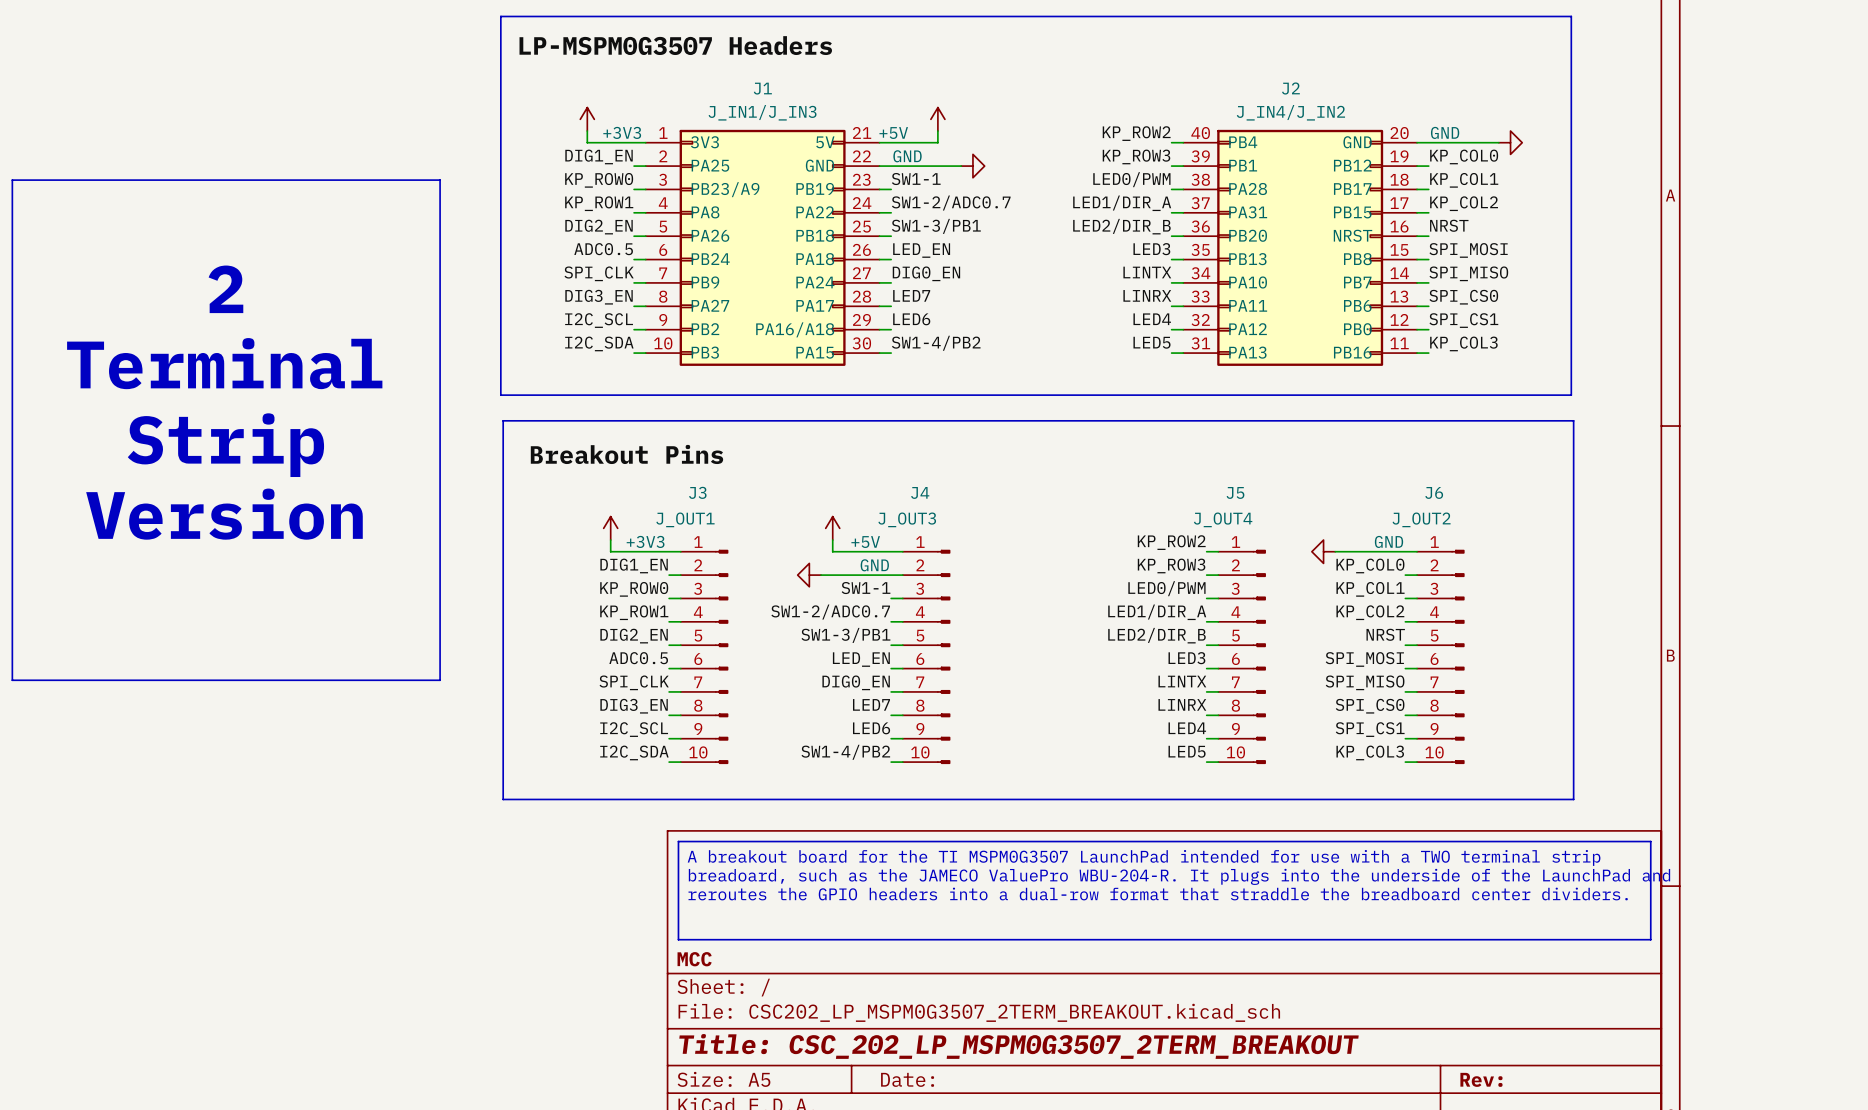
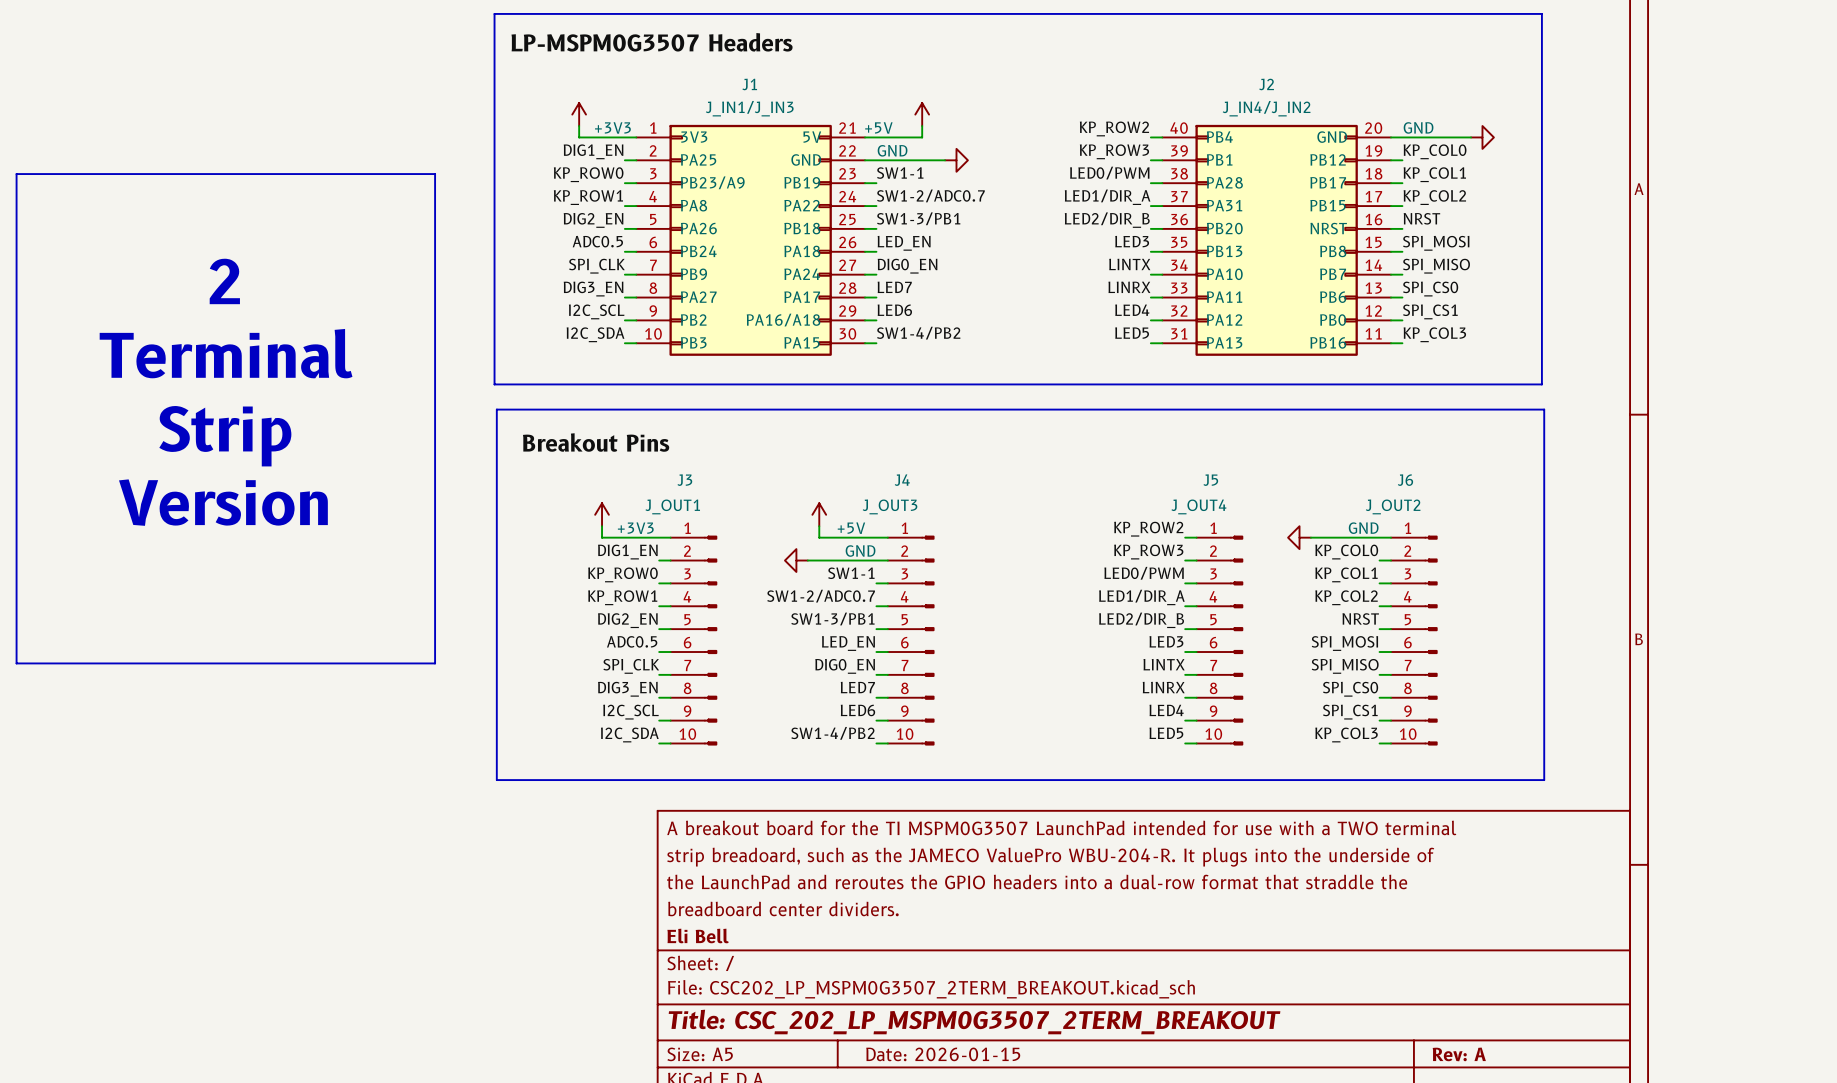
line: (678, 841) (1650, 841) (1650, 939) (678, 939) (678, 841) -> none
title block: none -> A breakout board for the TI MSPM0G3507 LaunchPad intended for use with a TWO terminal (1061, 827)
text: A breakout board for the TI MSPM0G3507 LaunchPad intended for use with a TWO terminal strip (1144, 857) -> none
text: breadoard, such as the JAMECO ValuePro WBU-204-R. It plugs into the underside of the LaunchPad and (1179, 876) -> none
title block: none -> strip breadoard, such as the JAMECO ValuePro WBU-204-R. It plugs into the underside of (1050, 857)
text: reroutes the GPIO headers into a dual-row format that straddle the breadboard center dividers. (1158, 894) -> none
title block: none -> the LaunchPad and reroutes the GPIO headers into a dual-row format that straddle the (1037, 881)
title block: none -> breadboard center dividers. (783, 909)
title block: MCC (694, 959) -> Eli Bell (698, 935)
title block: Date: (907, 1079) -> Date: 2026-01-15 (943, 1054)
title block: Rev: (1481, 1079) -> Rev: A (1459, 1054)

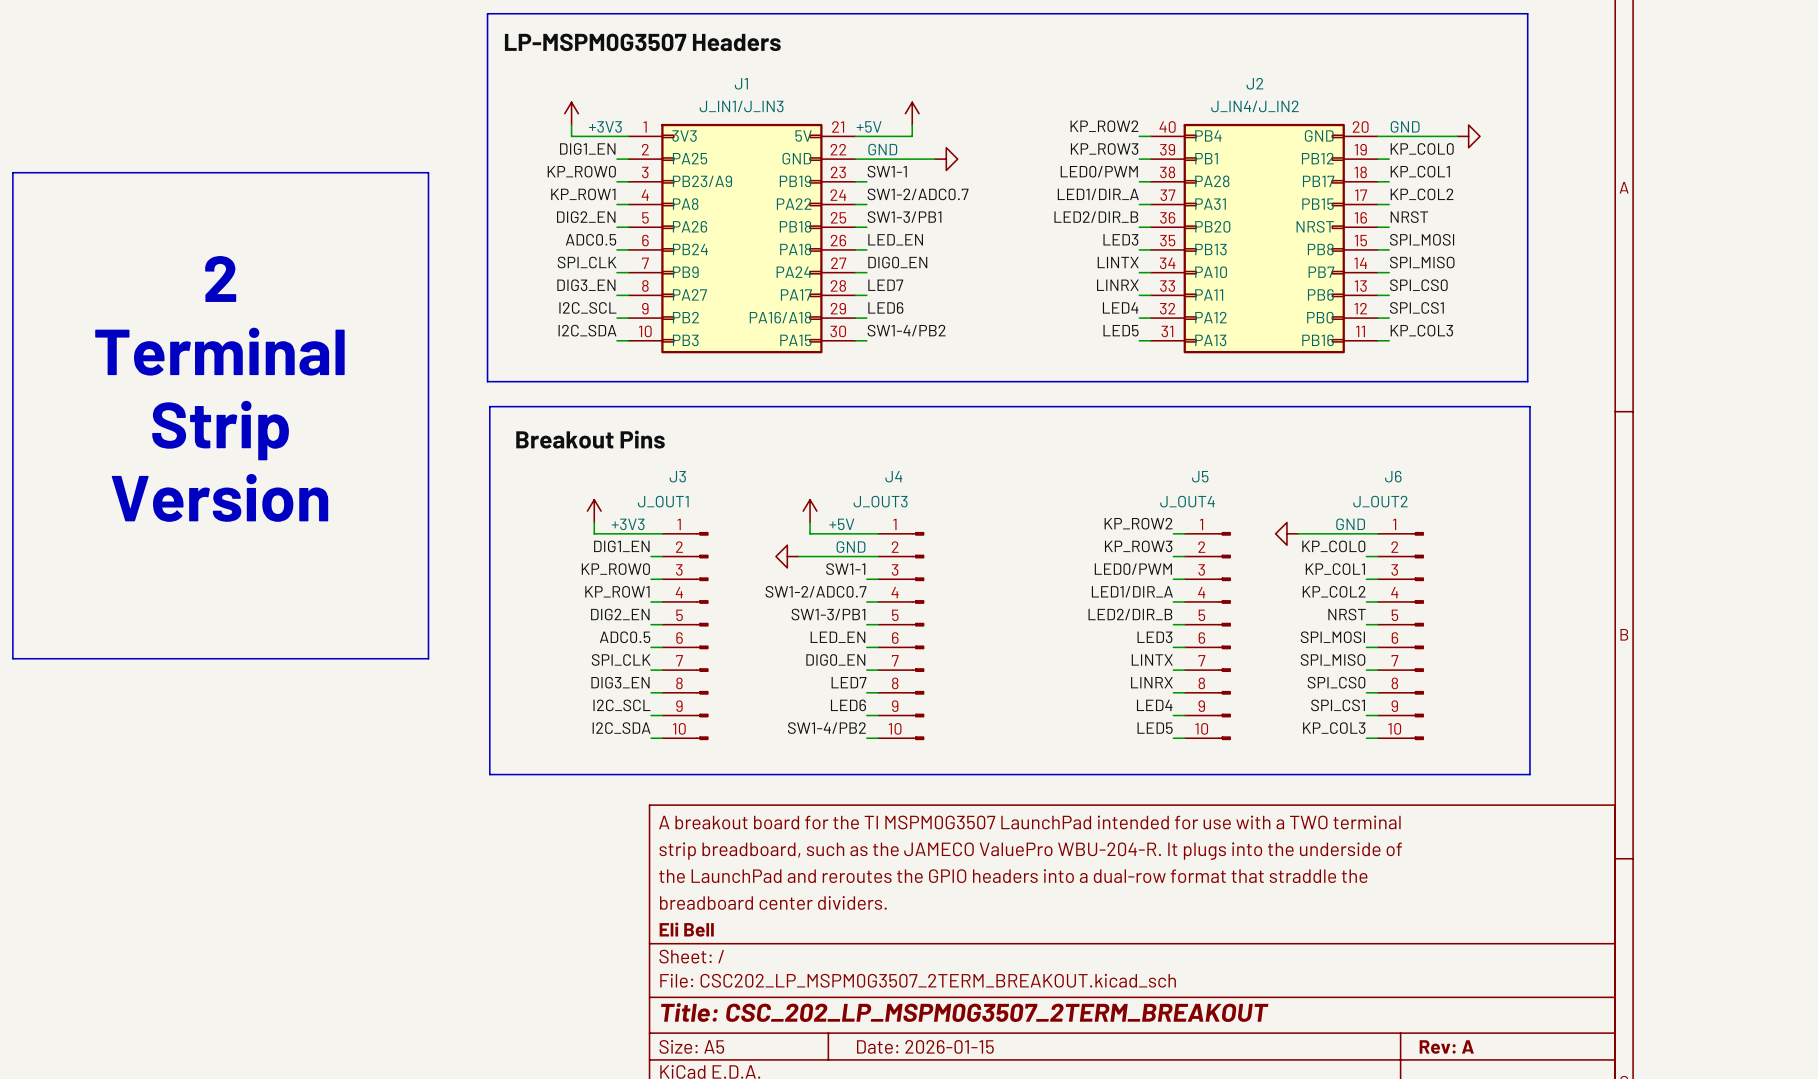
title block: strip breadoard, such as the JAMECO ValuePro WBU-204-R. It plugs into the underside of (1050, 857) -> strip breadboard, such as the JAMECO ValuePro WBU-204-R. It plugs into the underside of (1030, 851)

